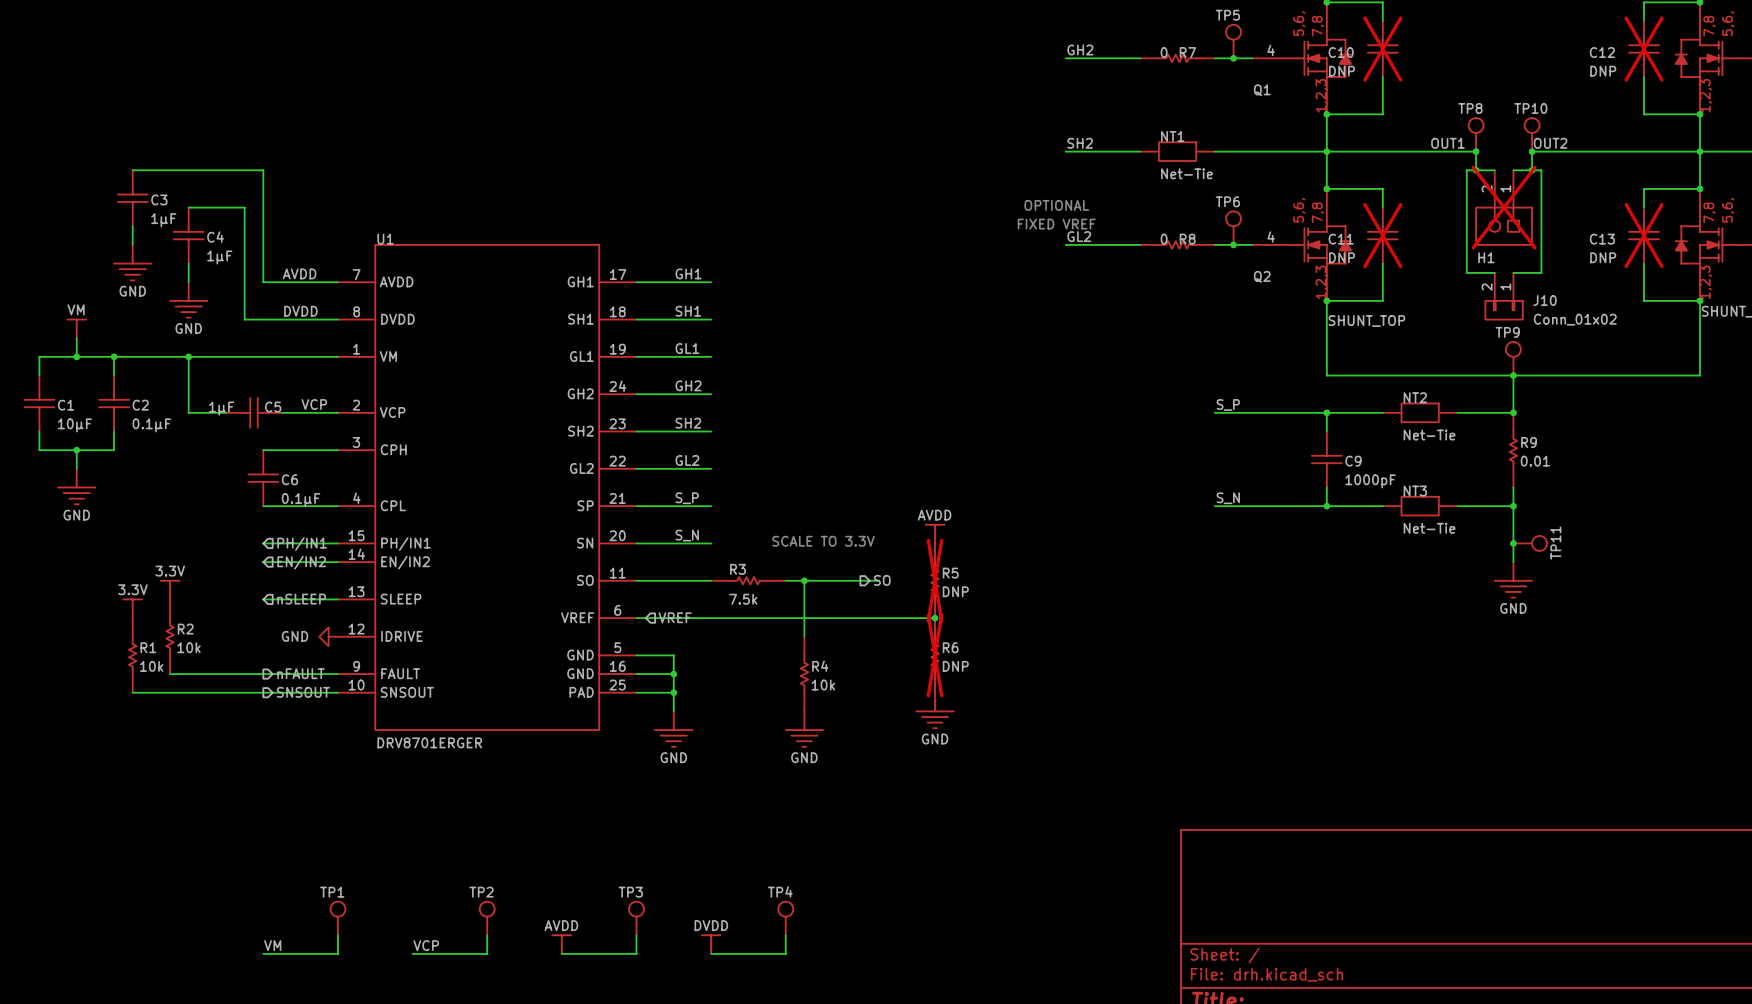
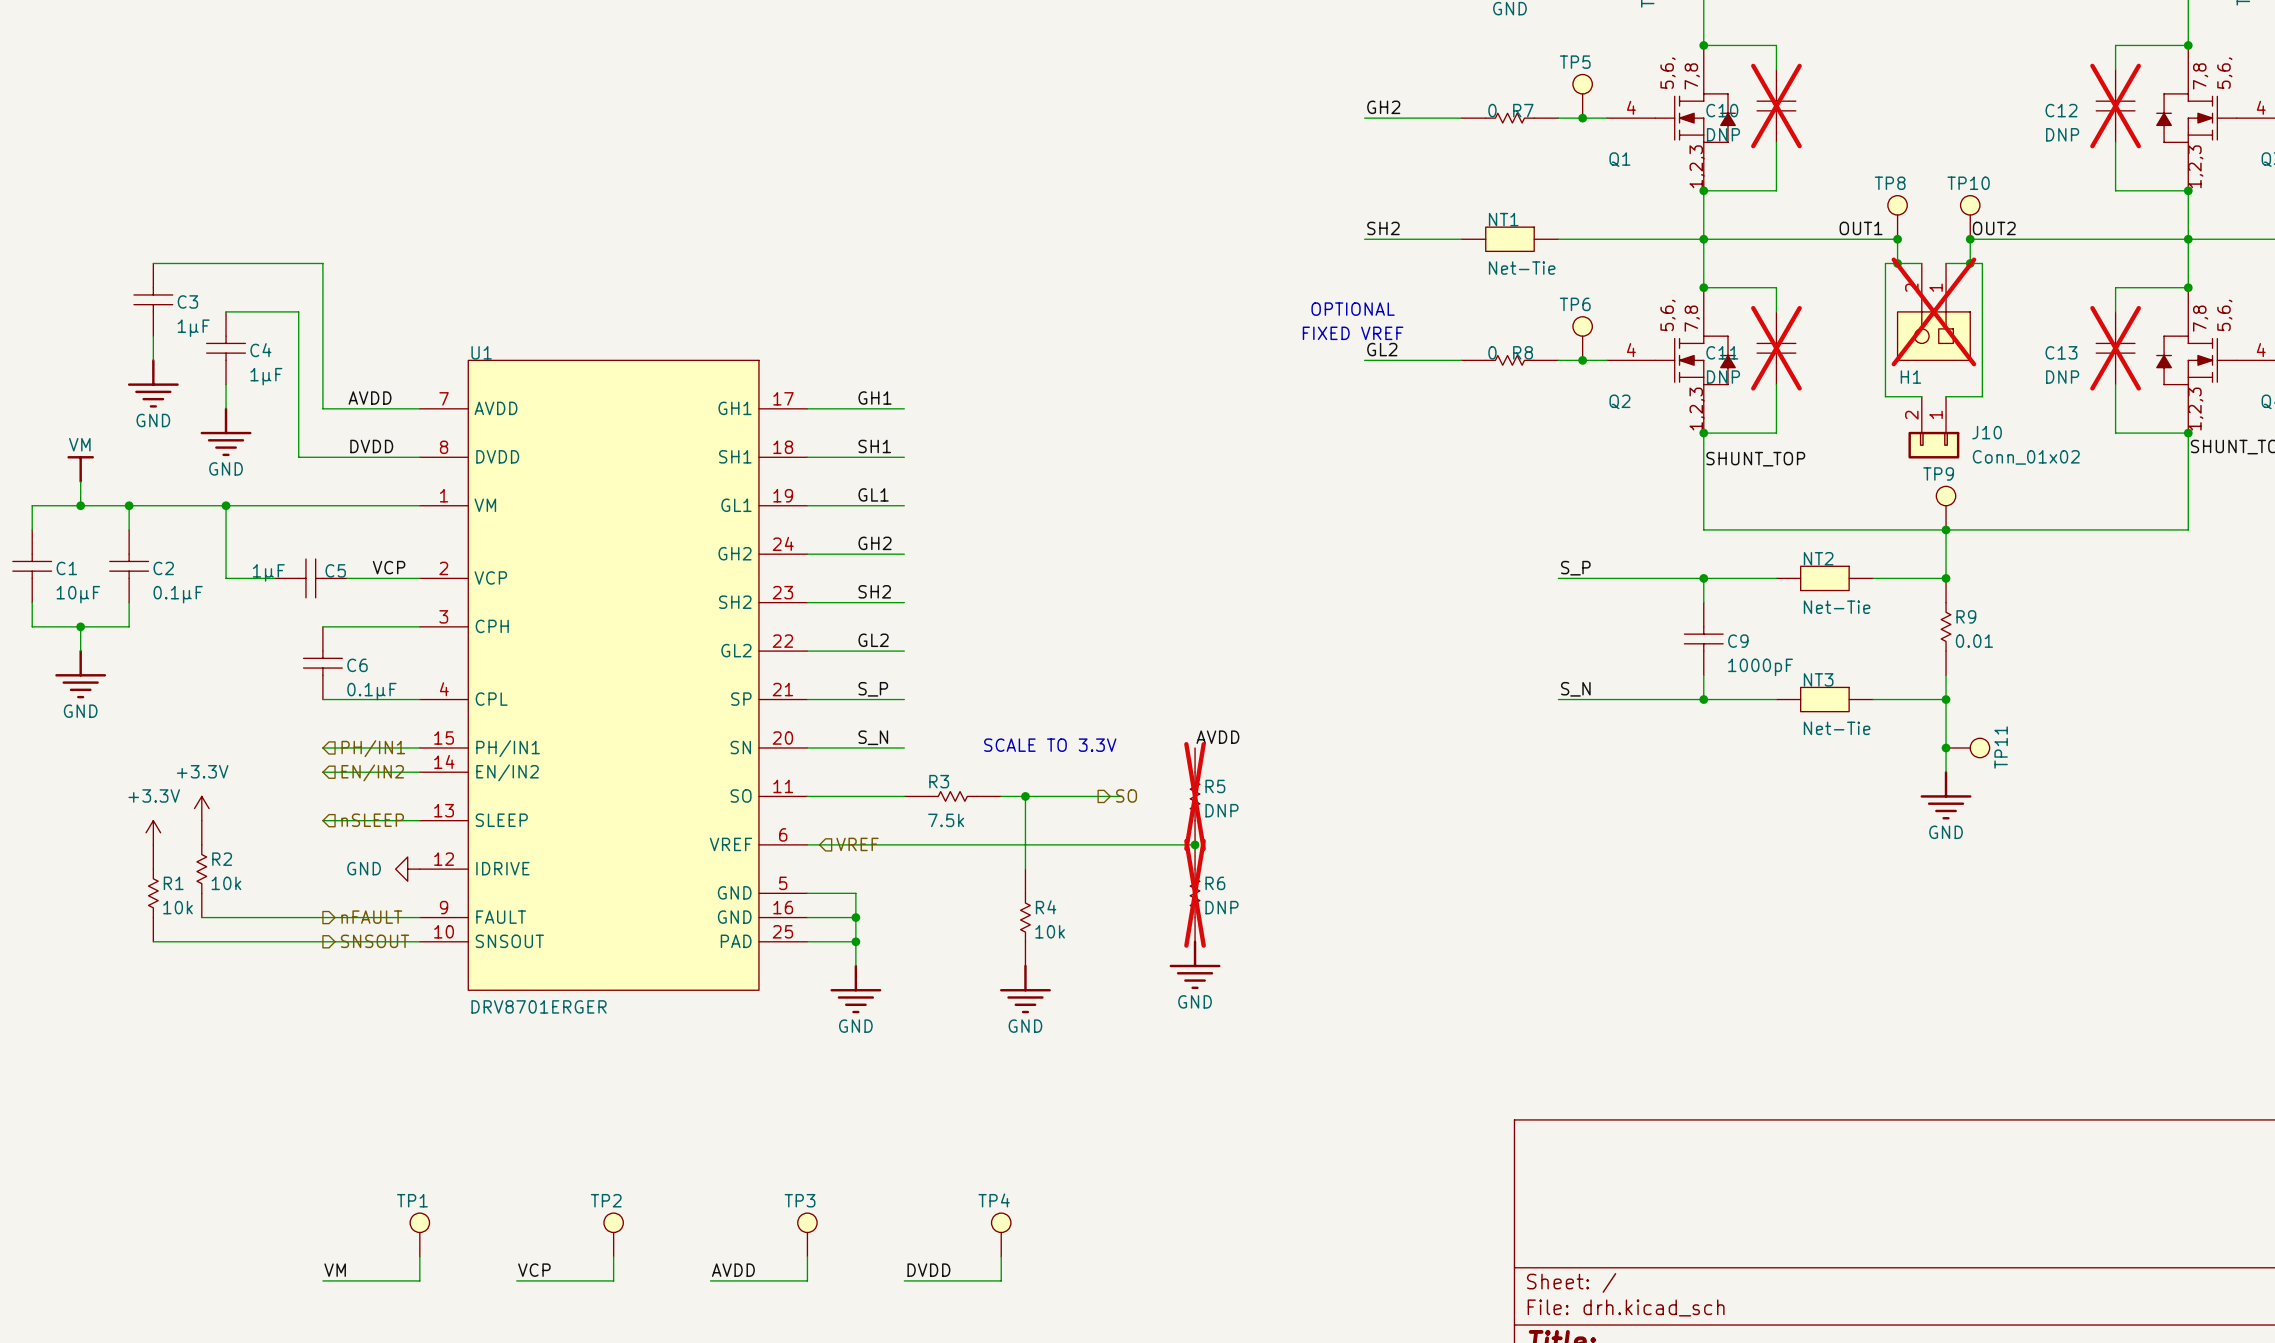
power symbol: AVDD (935, 534) -> none
label: none -> AVDD (1217, 737)
power symbol: 3.3V (170, 590) -> +3.3V (201, 808)
power symbol: 3.3V (132, 608) -> +3.3V (153, 832)
power symbol: AVDD (561, 944) -> none
power symbol: DVDD (711, 944) -> none
label: none -> AVDD (733, 1270)
label: none -> DVDD (928, 1270)

